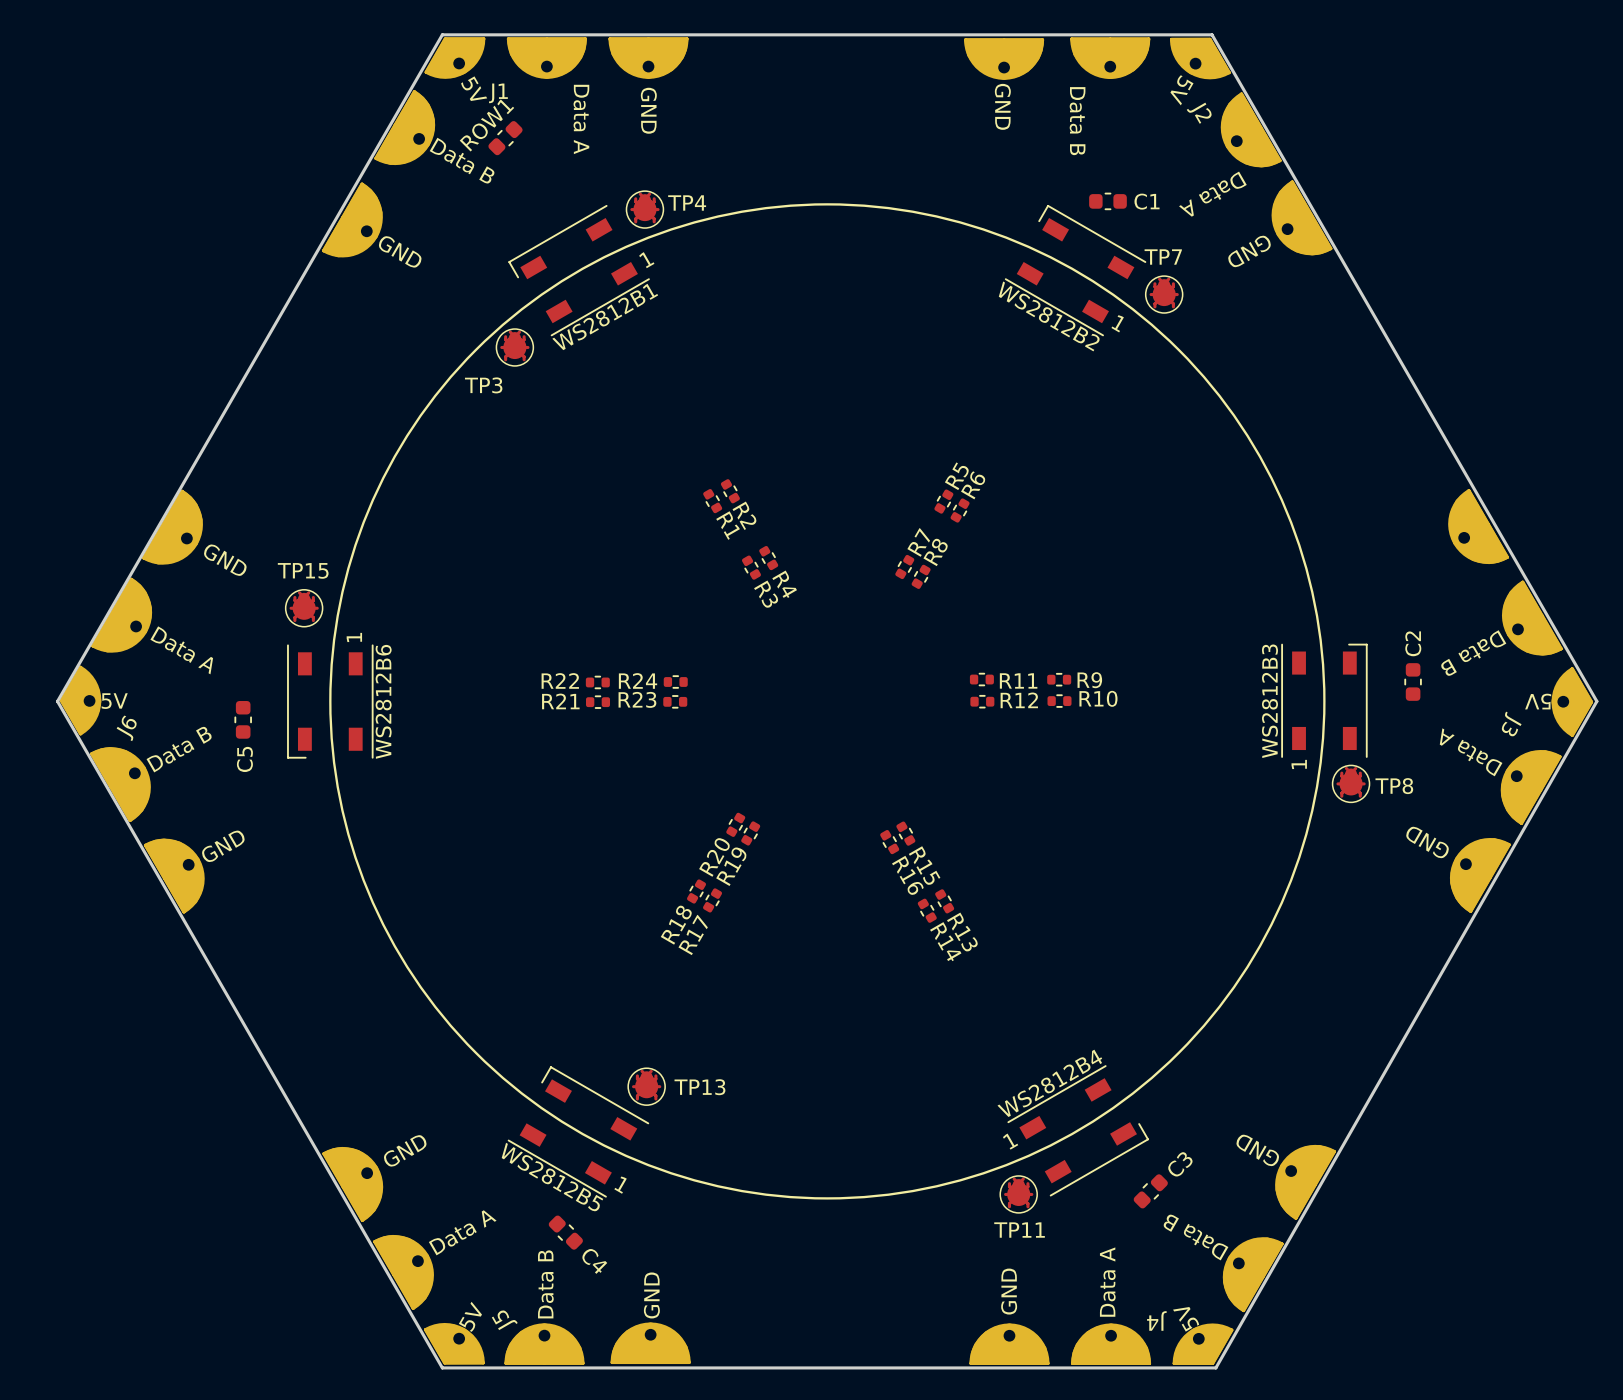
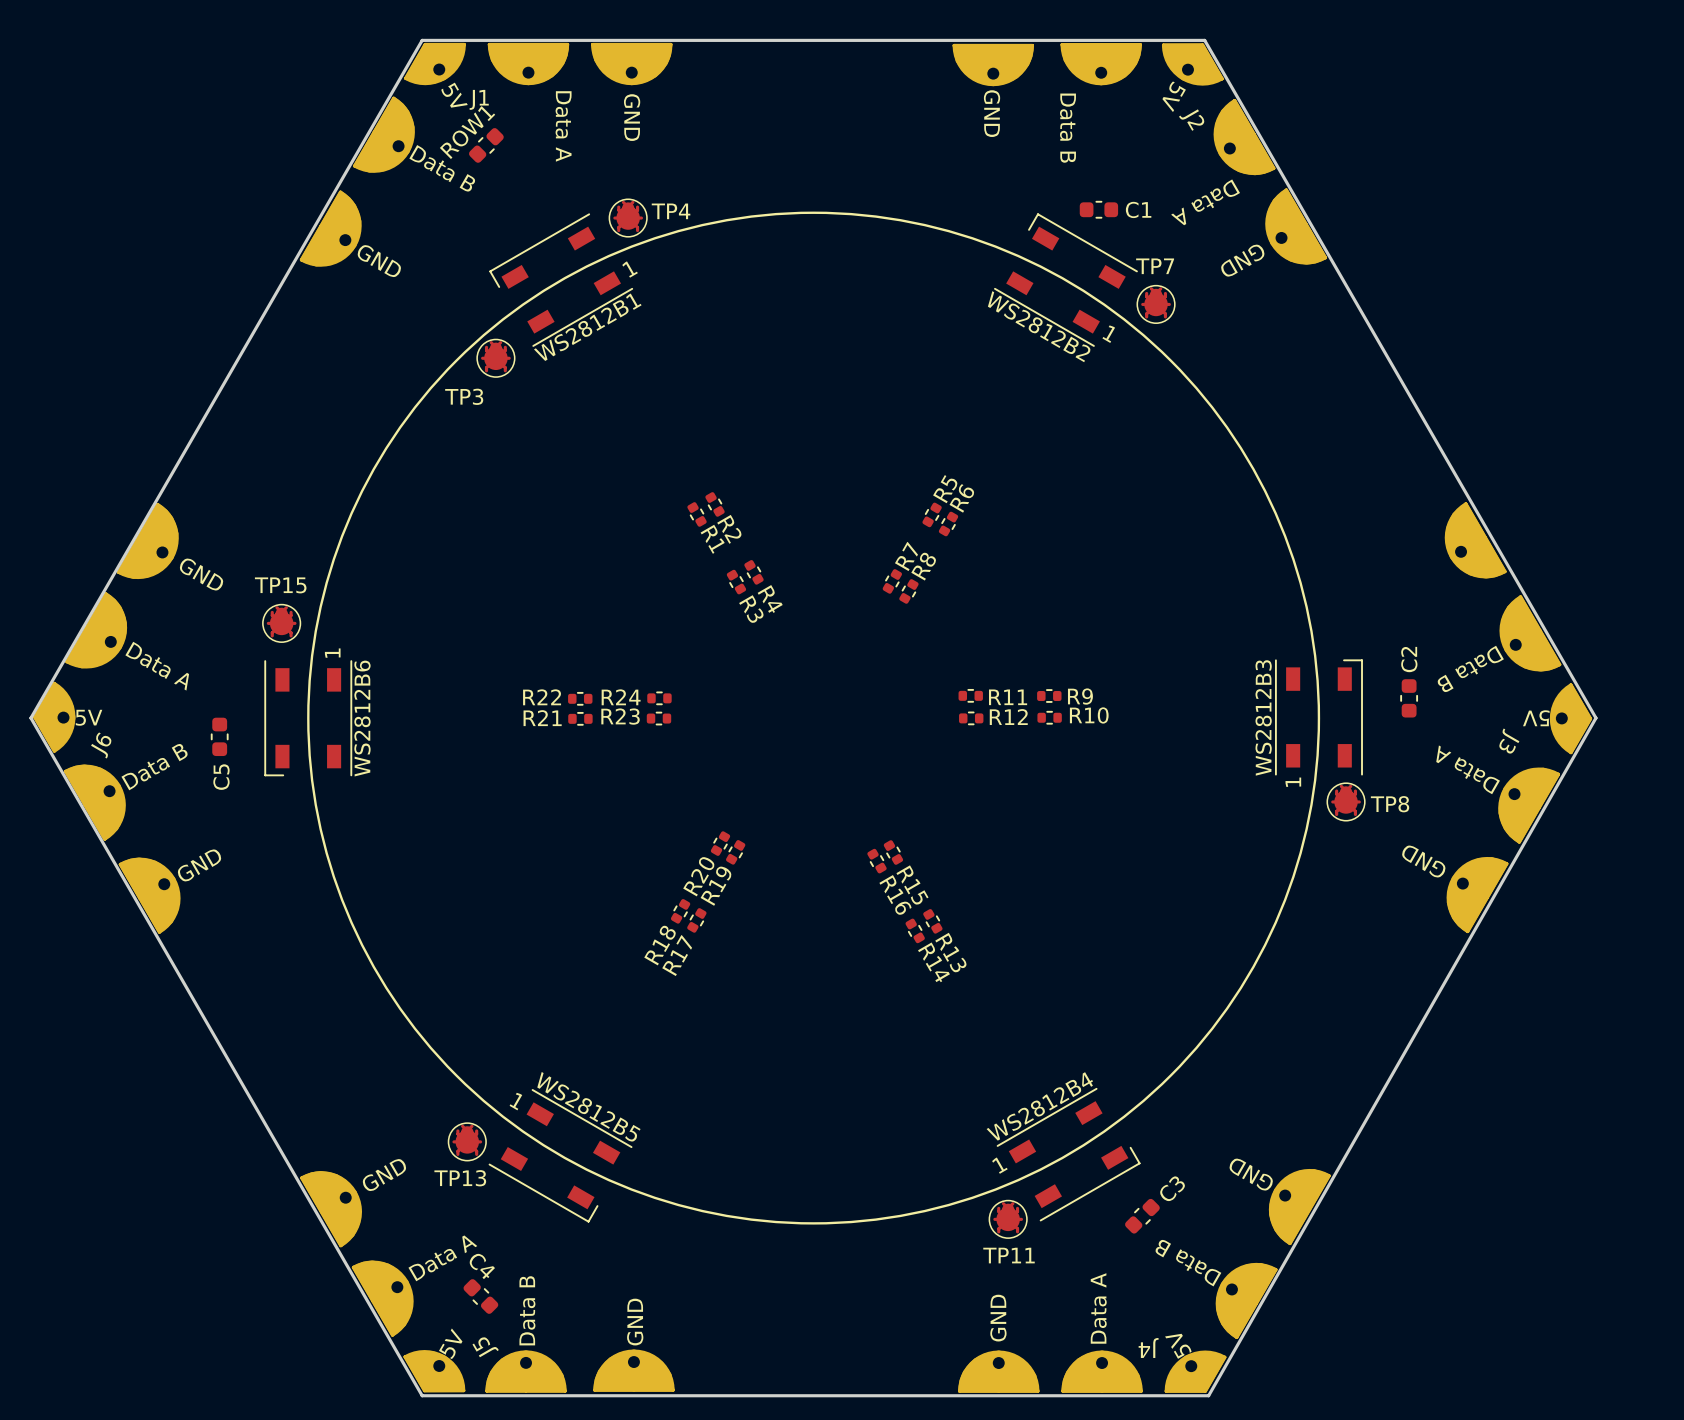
TP13 position: (646, 1086) -> (467, 1141)
TP13 name position: TP13 (699, 1087) -> TP13 (460, 1178)
WS2812B5 rotation: 0° (578, 1131) -> 180° (560, 1155)
C4 position: (565, 1232) -> (480, 1296)
C4 name position: C4 (594, 1261) -> C4 (482, 1266)

